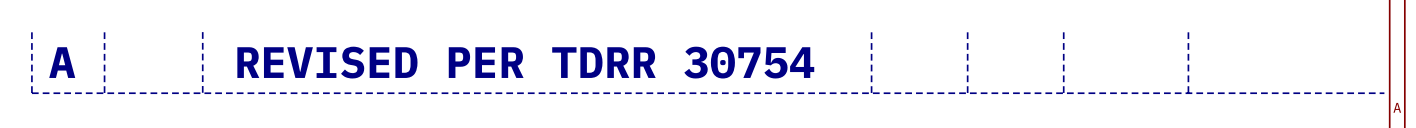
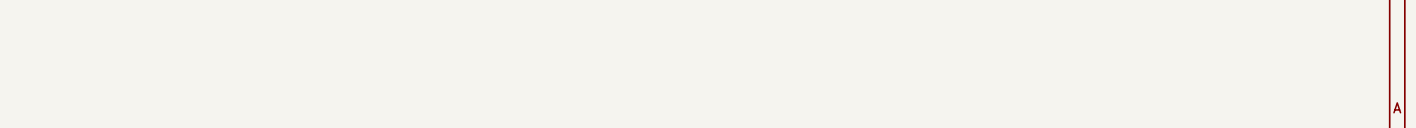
line: (31, 32) (31, 93) (1384, 93) -> none
line: (104, 32) (104, 93) -> none
line: (202, 32) (202, 93) -> none
line: (871, 32) (871, 93) -> none
line: (967, 32) (967, 93) -> none
line: (1063, 32) (1063, 93) -> none
line: (1188, 32) (1188, 93) -> none
text: A REVISED PER TDRR 30754 (431, 62) -> none

